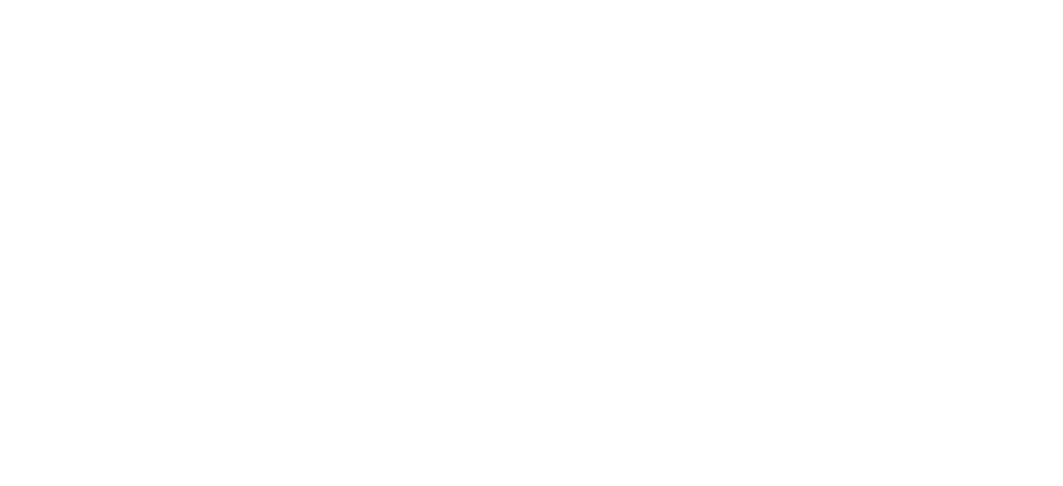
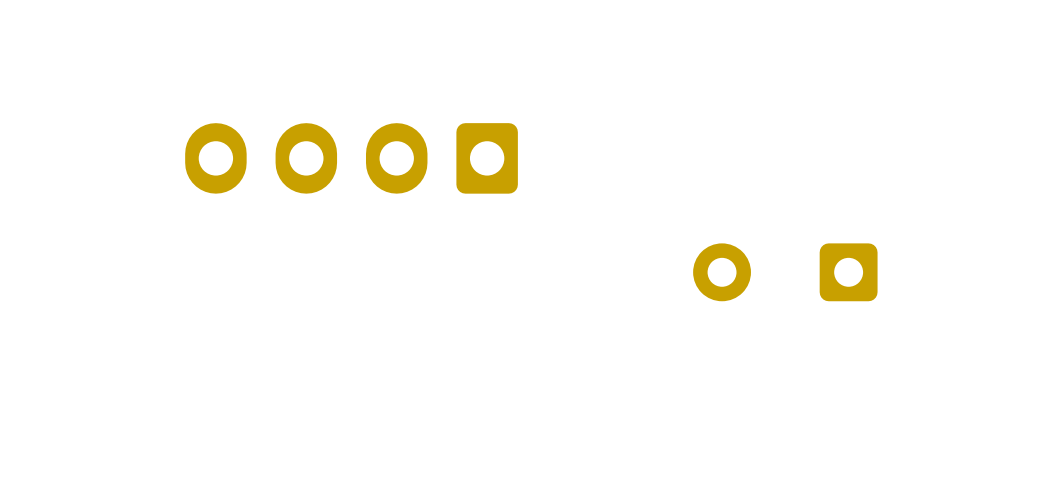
part: none -> (351, 158)
part: none -> (785, 272)

